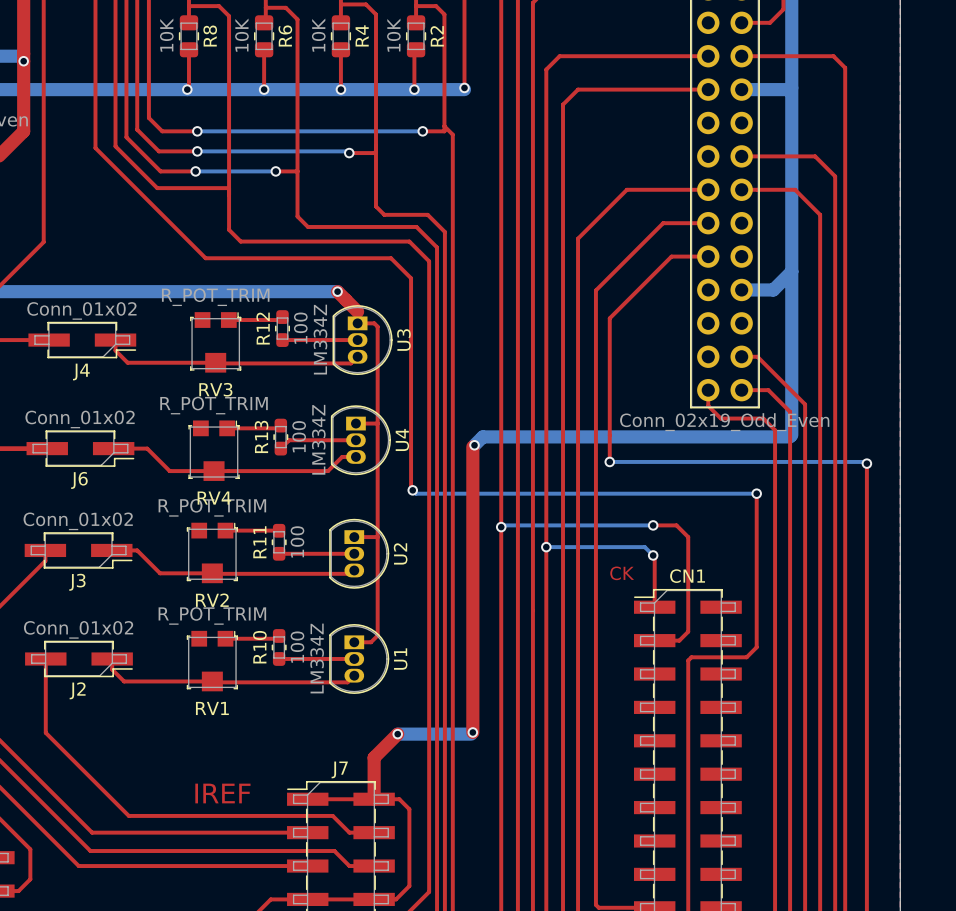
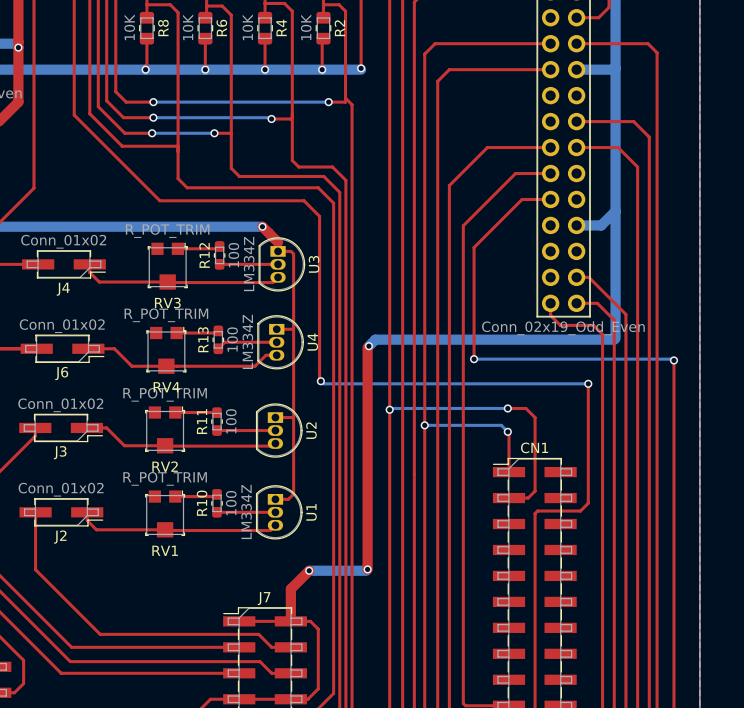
text: CK (622, 573) -> none
text: IREF (222, 793) -> none

